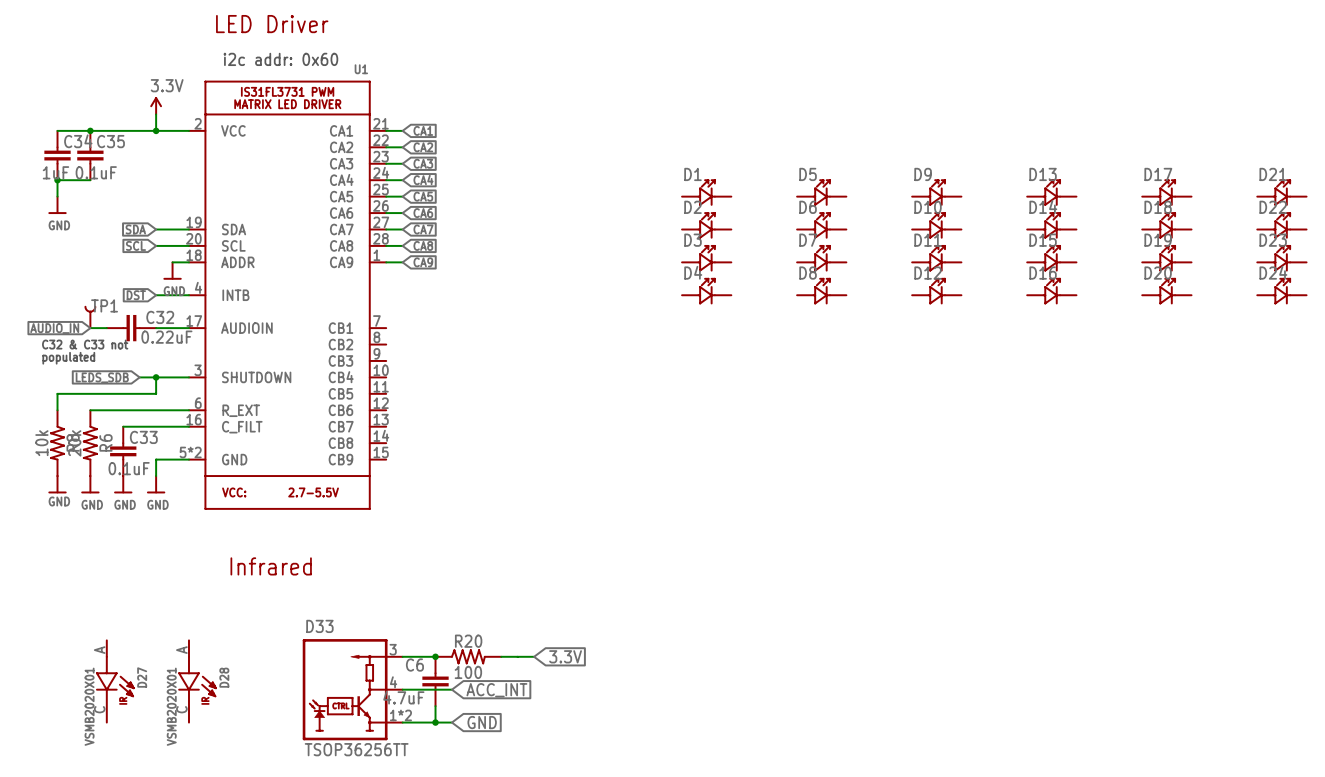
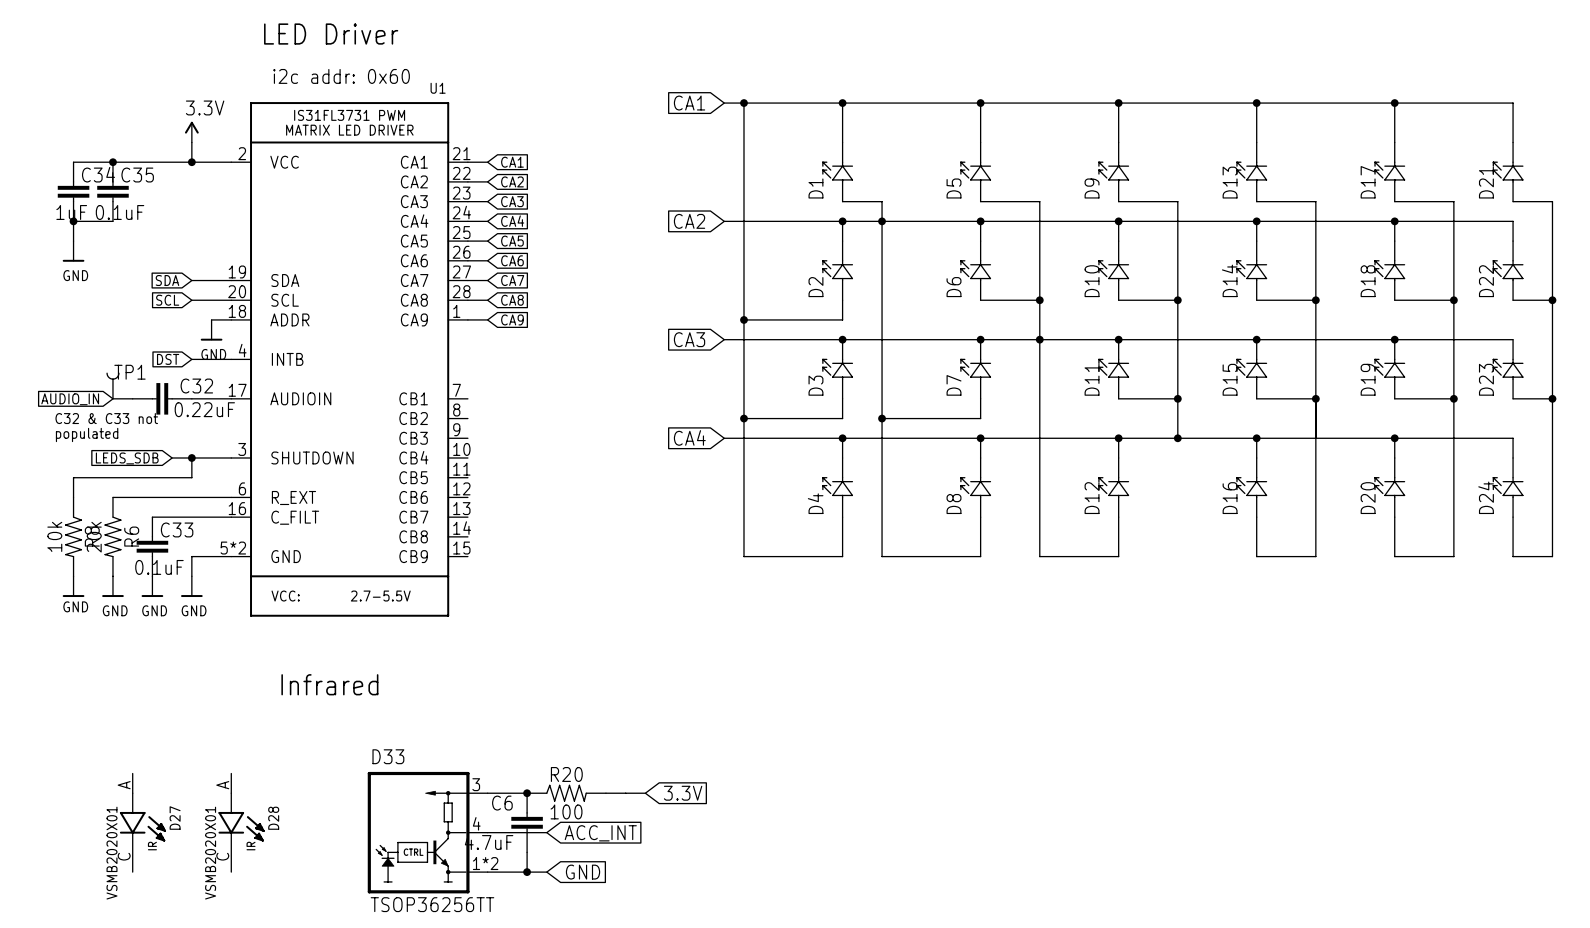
global label: none -> CA1 (689, 103)
wire: none -> (724, 103) (1513, 103) (1513, 142)
wire: none -> (743, 103) (743, 556) (842, 556) (842, 517)
junction: none -> (743, 103)
wire: none -> (842, 103) (842, 142)
junction: none -> (842, 103)
wire: none -> (980, 103) (980, 142)
junction: none -> (980, 103)
wire: none -> (1118, 103) (1118, 142)
junction: none -> (1118, 103)
wire: none -> (1256, 103) (1256, 142)
junction: none -> (1256, 103)
wire: none -> (1394, 103) (1394, 142)
junction: none -> (1394, 103)
wire: none -> (842, 201) (882, 201) (882, 556) (980, 556) (980, 517)
wire: none -> (980, 201) (1039, 201) (1039, 556) (1118, 556) (1118, 517)
wire: none -> (1118, 201) (1177, 201) (1177, 438)
wire: none -> (1256, 201) (1315, 201) (1315, 556) (1256, 556) (1256, 517)
wire: none -> (1394, 201) (1453, 201) (1453, 556) (1394, 556) (1394, 517)
wire: none -> (1513, 201) (1552, 201) (1552, 556) (1513, 556) (1513, 517)
global label: none -> CA2 (689, 221)
wire: none -> (724, 221) (1513, 221) (1513, 241)
wire: none -> (842, 221) (842, 241)
junction: none -> (842, 221)
junction: none -> (882, 221)
wire: none -> (980, 221) (980, 241)
junction: none -> (980, 221)
wire: none -> (1118, 221) (1118, 241)
junction: none -> (1118, 221)
wire: none -> (1256, 221) (1256, 241)
junction: none -> (1256, 221)
wire: none -> (1394, 221) (1394, 241)
junction: none -> (1394, 221)
D1 rotation: 0° (706, 192) -> 90° counterclockwise (837, 172)
D1 position: (706, 192) -> (837, 172)
D5 rotation: 0° (821, 192) -> 90° counterclockwise (975, 172)
D5 position: (821, 192) -> (975, 172)
D9 rotation: 0° (936, 192) -> 90° counterclockwise (1113, 172)
D9 position: (936, 192) -> (1113, 172)
D13 rotation: 0° (1051, 192) -> 90° counterclockwise (1251, 172)
D13 position: (1051, 192) -> (1251, 172)
D17 rotation: 0° (1166, 192) -> 90° counterclockwise (1389, 172)
D17 position: (1166, 192) -> (1389, 172)
D21 rotation: 0° (1281, 192) -> 90° counterclockwise (1508, 172)
D21 position: (1281, 192) -> (1508, 172)
D2 rotation: 0° (706, 225) -> 90° counterclockwise (837, 270)
D6 rotation: 0° (821, 225) -> 90° counterclockwise (975, 270)
D10 rotation: 0° (936, 225) -> 90° counterclockwise (1113, 270)
D14 rotation: 0° (1051, 225) -> 90° counterclockwise (1251, 270)
D18 rotation: 0° (1166, 225) -> 90° counterclockwise (1389, 270)
D22 rotation: 0° (1281, 225) -> 90° counterclockwise (1508, 270)
wire: none -> (842, 300) (842, 319) (743, 319)
wire: none -> (980, 300) (1039, 300)
junction: none -> (1039, 300)
wire: none -> (1118, 300) (1177, 300)
junction: none -> (1177, 300)
wire: none -> (1256, 300) (1315, 300)
junction: none -> (1315, 300)
wire: none -> (1394, 300) (1453, 300)
junction: none -> (1453, 300)
junction: none -> (1552, 300)
D3 rotation: 0° (706, 258) -> 90° counterclockwise (837, 369)
D3 position: (706, 258) -> (837, 369)
D7 rotation: 0° (821, 258) -> 90° counterclockwise (975, 369)
D7 position: (821, 258) -> (975, 369)
D11 rotation: 0° (936, 258) -> 90° counterclockwise (1113, 369)
D11 position: (936, 258) -> (1113, 369)
D15 rotation: 0° (1051, 258) -> 90° counterclockwise (1251, 369)
D15 position: (1051, 258) -> (1251, 369)
D19 rotation: 0° (1166, 258) -> 90° counterclockwise (1389, 369)
D19 position: (1166, 258) -> (1389, 369)
D23 rotation: 0° (1281, 258) -> 90° counterclockwise (1508, 369)
D23 position: (1281, 258) -> (1508, 369)
junction: none -> (743, 319)
global label: none -> CA3 (689, 339)
wire: none -> (724, 339) (1513, 339)
junction: none -> (842, 339)
junction: none -> (980, 339)
junction: none -> (1039, 339)
junction: none -> (1118, 339)
junction: none -> (1256, 339)
junction: none -> (1394, 339)
D4 rotation: 0° (706, 291) -> 90° counterclockwise (837, 487)
D4 position: (706, 291) -> (837, 487)
D8 rotation: 0° (821, 291) -> 90° counterclockwise (975, 487)
D8 position: (821, 291) -> (975, 487)
D12 rotation: 0° (936, 291) -> 90° counterclockwise (1113, 487)
D12 position: (936, 291) -> (1113, 487)
D16 rotation: 0° (1051, 291) -> 90° counterclockwise (1251, 487)
D16 position: (1051, 291) -> (1251, 487)
D20 rotation: 0° (1166, 291) -> 90° counterclockwise (1389, 487)
D20 position: (1166, 291) -> (1389, 487)
D24 rotation: 0° (1281, 291) -> 90° counterclockwise (1508, 487)
D24 position: (1281, 291) -> (1508, 487)
wire: none -> (842, 398) (842, 418) (743, 418)
wire: none -> (980, 398) (980, 418) (882, 418)
wire: none -> (1118, 398) (1177, 398)
junction: none -> (1177, 398)
wire: none -> (1256, 398) (1315, 398)
junction: none -> (1315, 398)
wire: none -> (1394, 398) (1453, 398)
junction: none -> (1453, 398)
wire: none -> (1513, 398) (1552, 398)
junction: none -> (1552, 398)
junction: none -> (743, 418)
junction: none -> (882, 418)
global label: none -> CA4 (689, 437)
wire: none -> (724, 438) (1513, 438) (1513, 457)
wire: none -> (842, 438) (842, 457)
junction: none -> (842, 438)
wire: none -> (980, 438) (980, 457)
junction: none -> (980, 438)
wire: none -> (1118, 438) (1118, 457)
junction: none -> (1118, 438)
junction: none -> (1177, 438)
wire: none -> (1256, 438) (1256, 457)
junction: none -> (1256, 438)
wire: none -> (1394, 438) (1394, 457)
junction: none -> (1394, 438)

